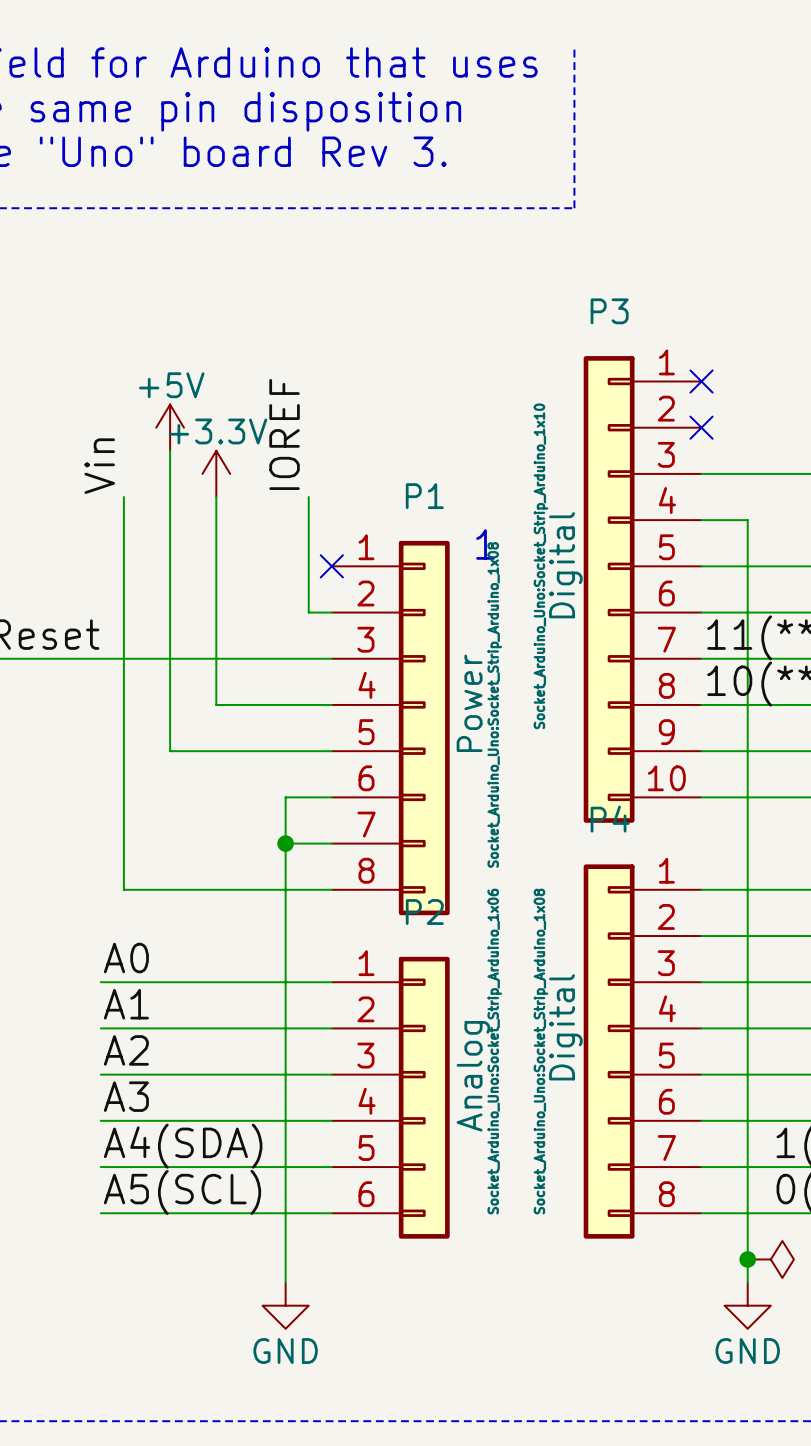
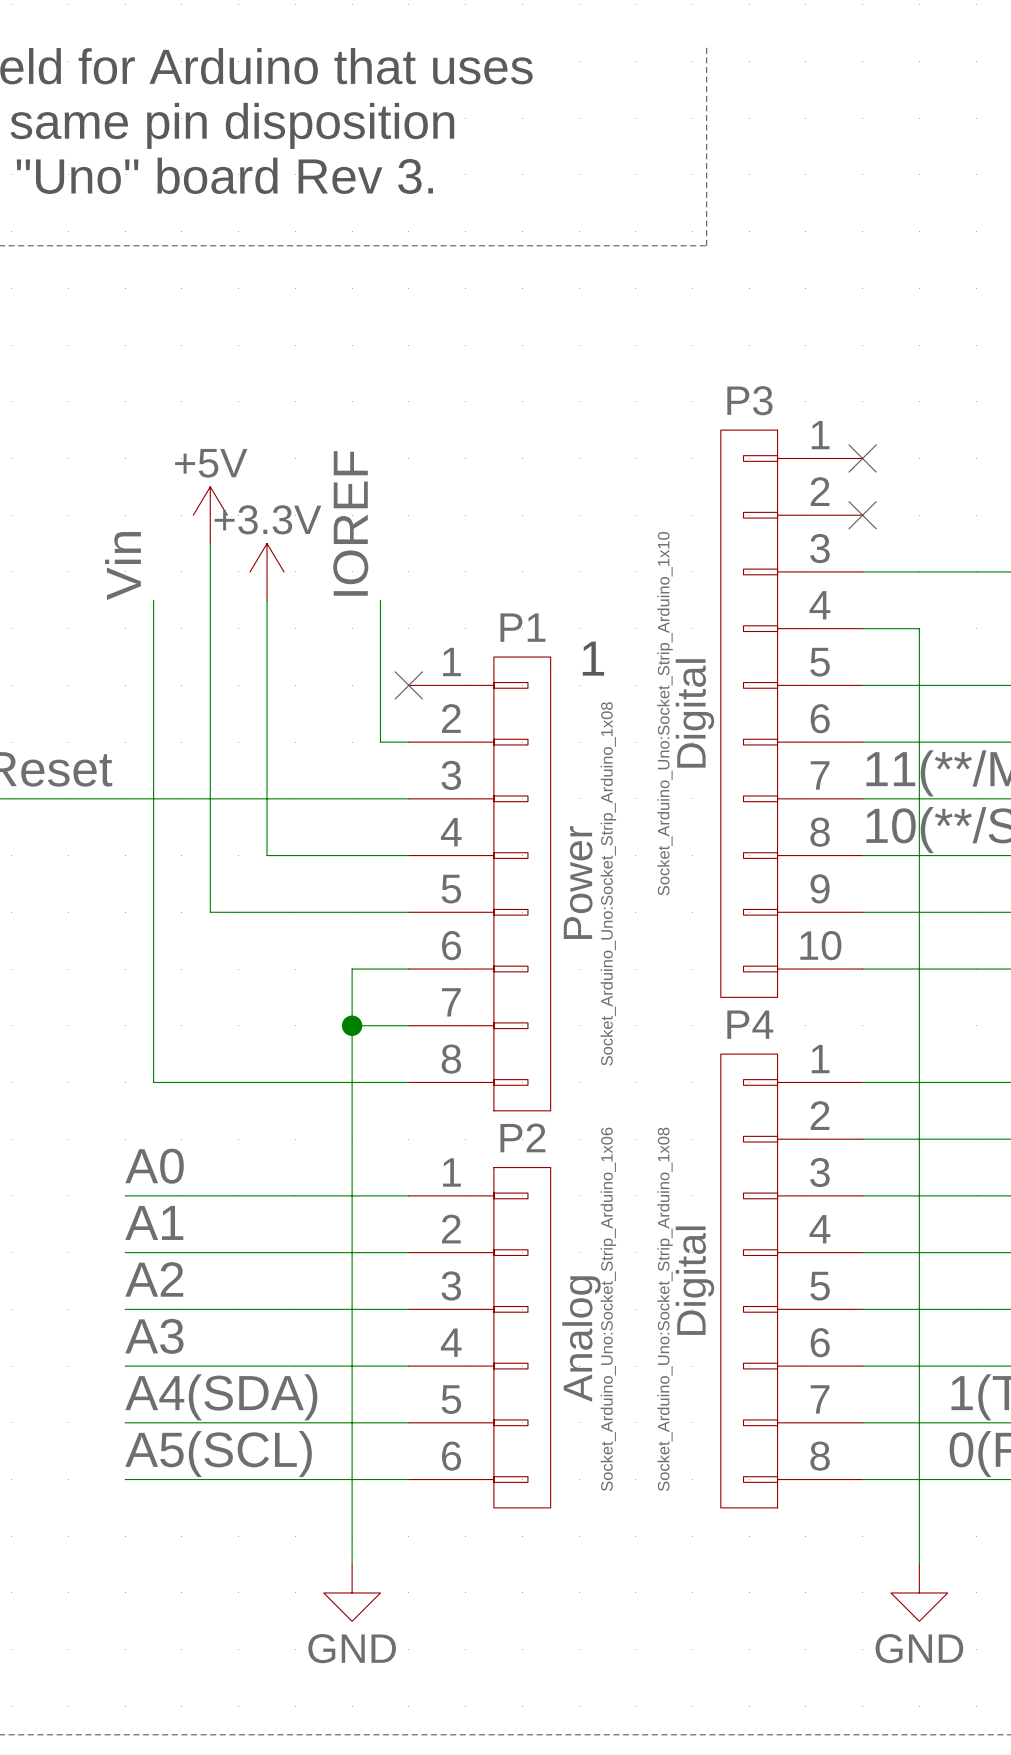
P3 symbol: [583, 356, 702, 823] -> [720, 430, 863, 998]
P1 symbol: [331, 540, 450, 916] -> [408, 657, 551, 1111]
P4 symbol: [583, 864, 702, 1239] -> [720, 1054, 863, 1508]
P2 symbol: [331, 956, 450, 1239] -> [408, 1167, 551, 1508]
junction: (747, 1259) -> none
power symbol: (770, 1259) -> none

